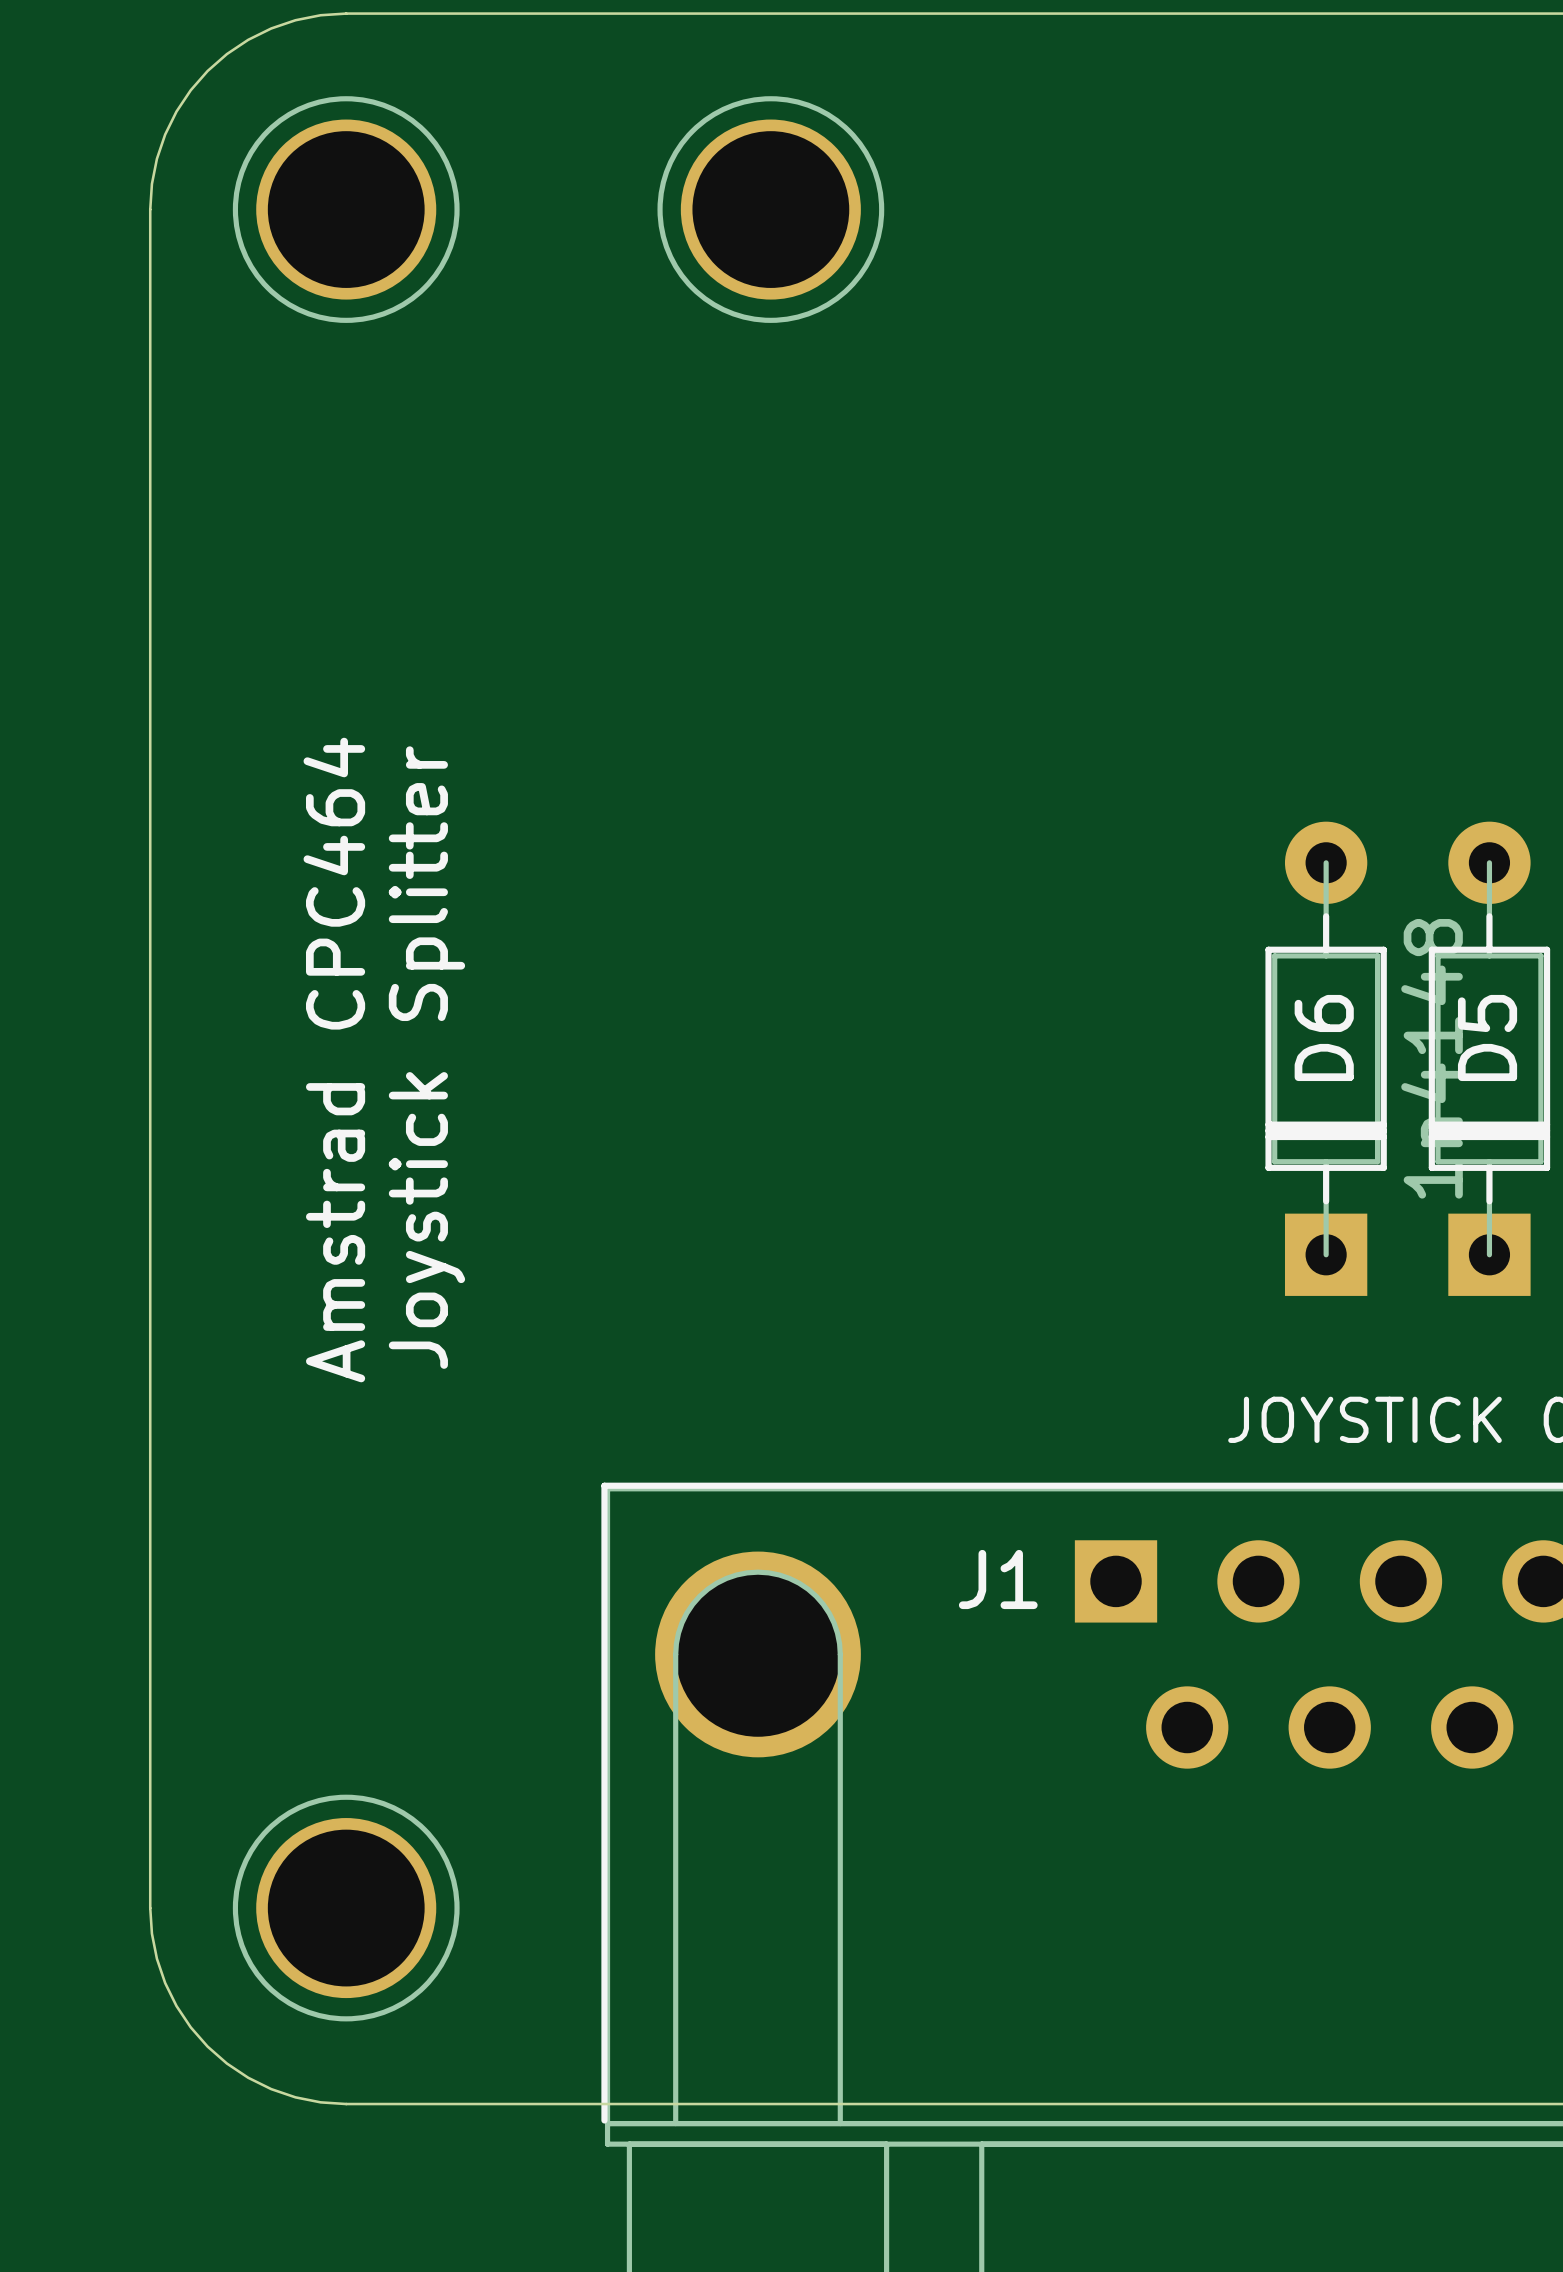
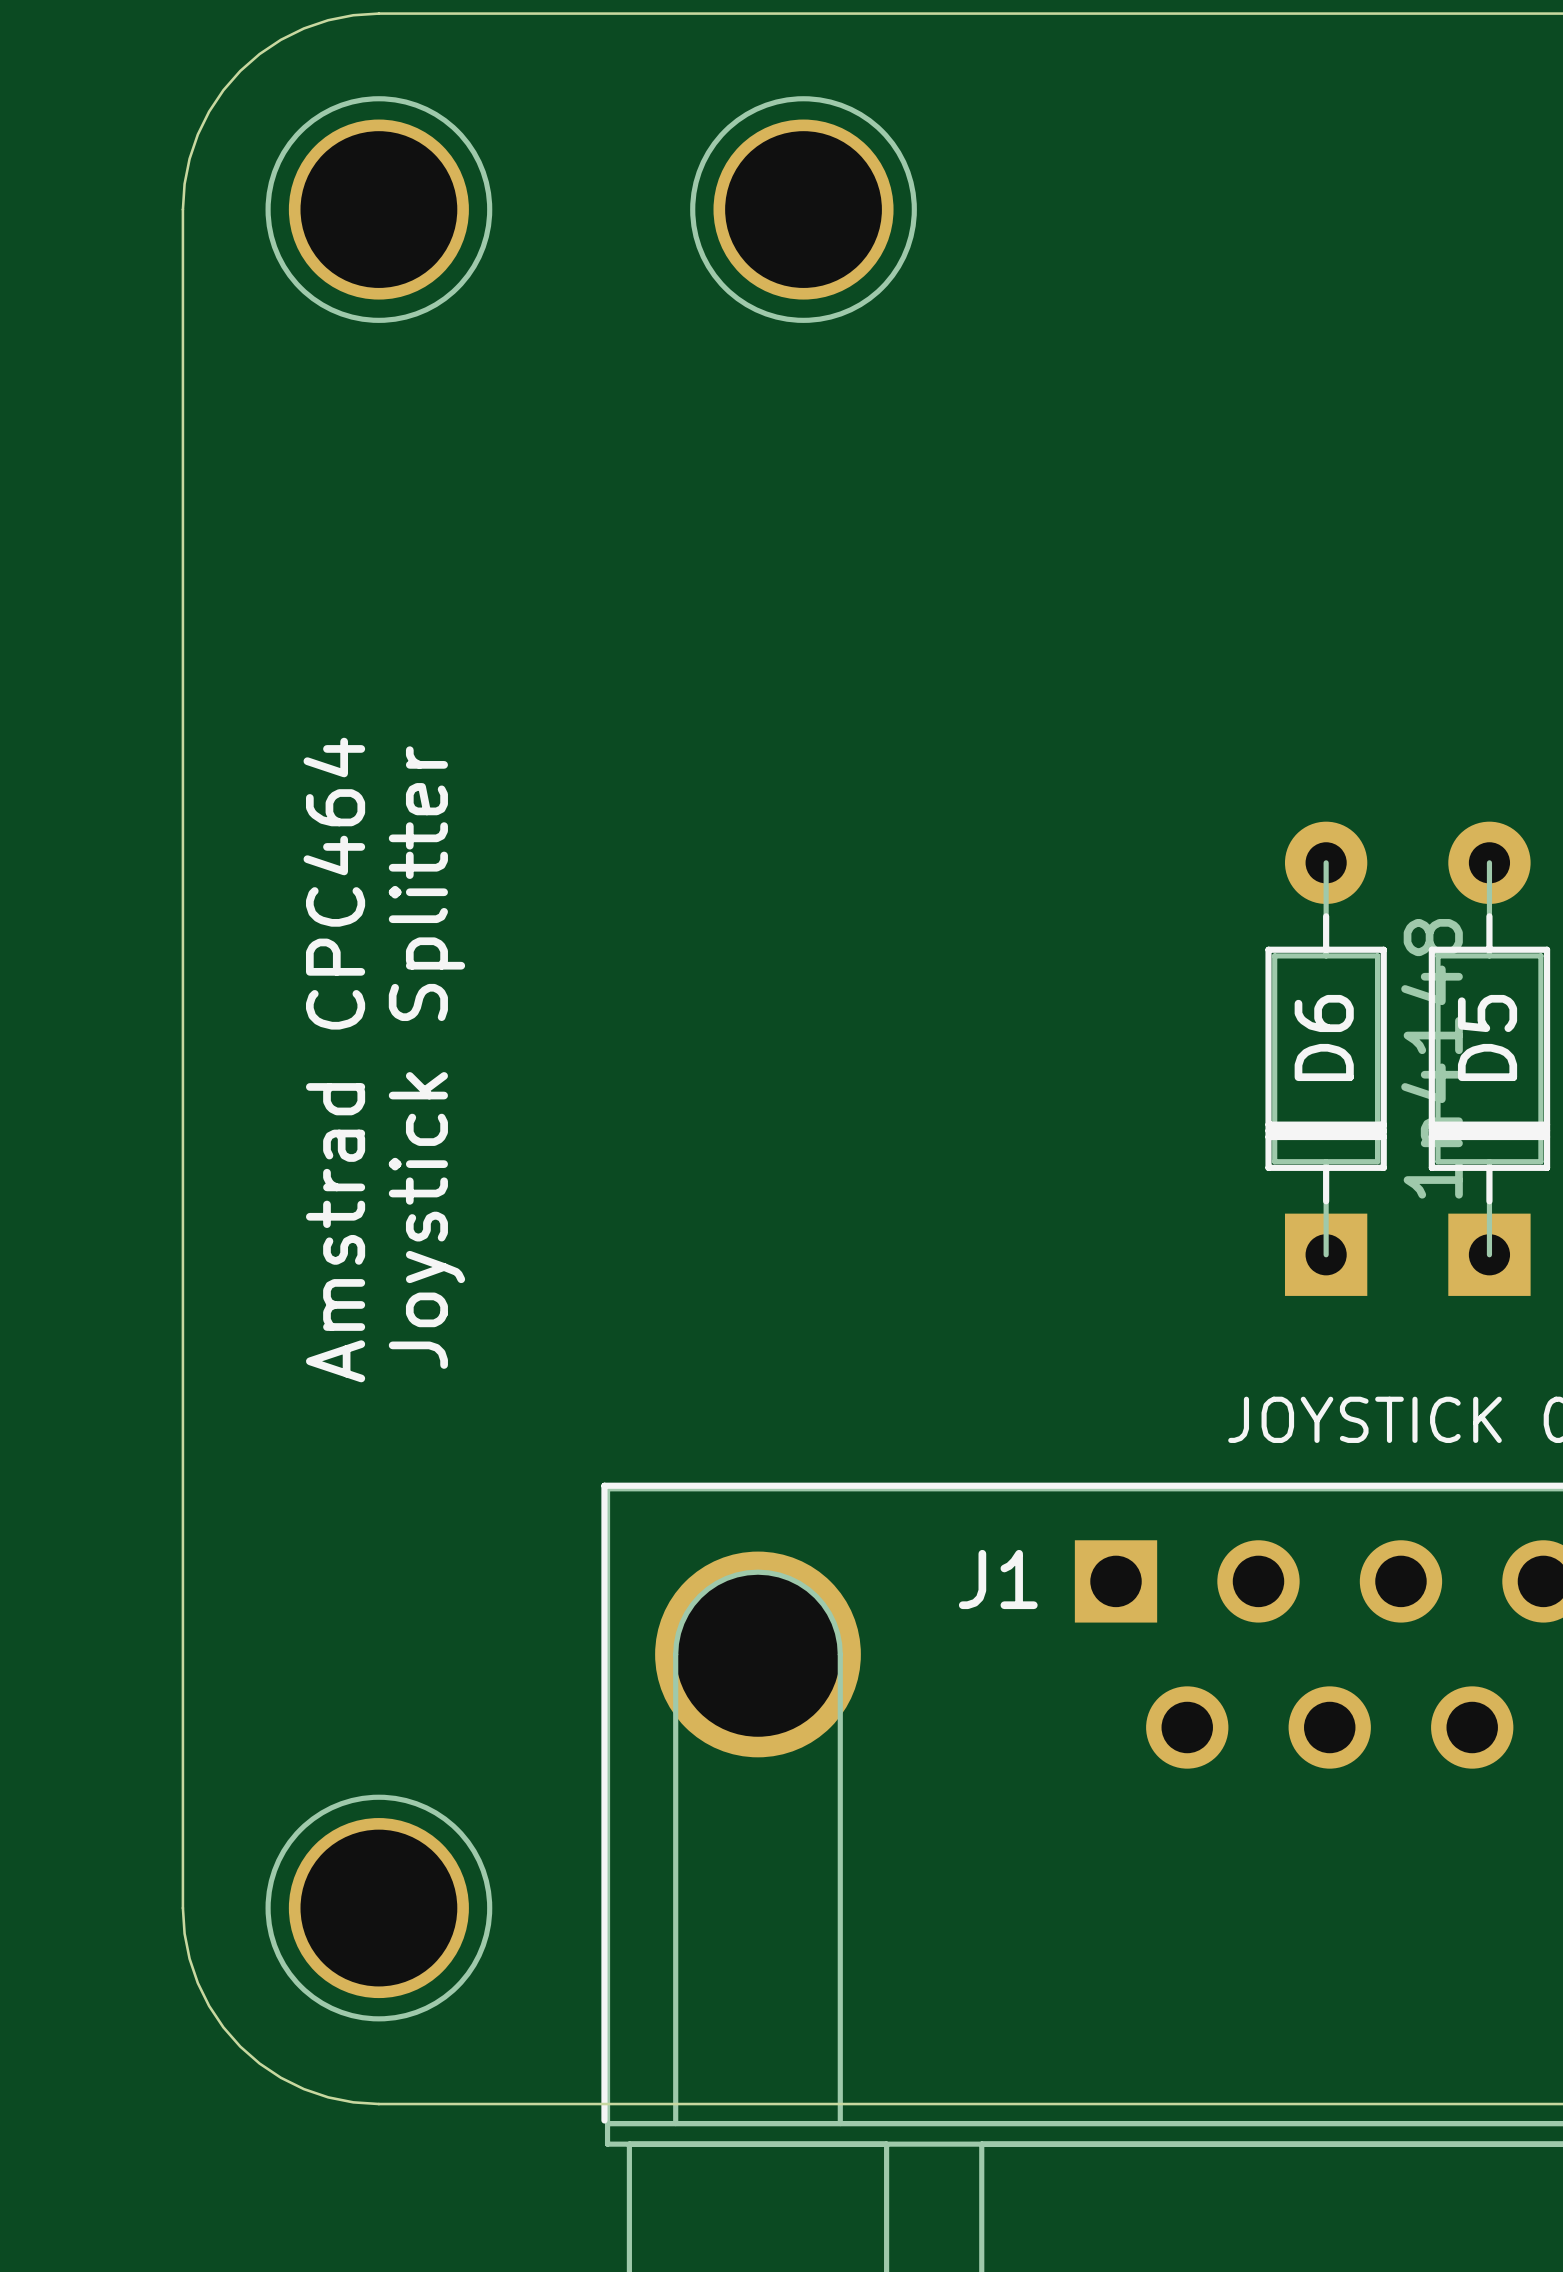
board edge: (378, 13) (320, 15) (295, 20) (271, 28) (248, 39) (226, 54) (207, 70) (190, 90) (176, 111) (165, 134) (156, 158) (151, 183) (150, 209) (150, 1908) (151, 1933) (156, 1958) (165, 1983) (176, 2006) (190, 2027) (207, 2046) (226, 2063) (248, 2077) (271, 2089) (295, 2097) (320, 2102) (378, 2104) -> (378, 13) (353, 15) (328, 20) (303, 28) (280, 39) (259, 54) (240, 70) (223, 90) (209, 111) (197, 134) (189, 158) (184, 183) (182, 209) (182, 1908) (184, 1933) (189, 1958) (197, 1983) (209, 2006) (223, 2027) (240, 2046) (259, 2063) (280, 2077) (303, 2089) (328, 2097) (353, 2102) (378, 2104)
part position: (346, 209) -> (378, 209)
part position: (770, 209) -> (803, 209)
part position: (346, 1908) -> (378, 1908)

